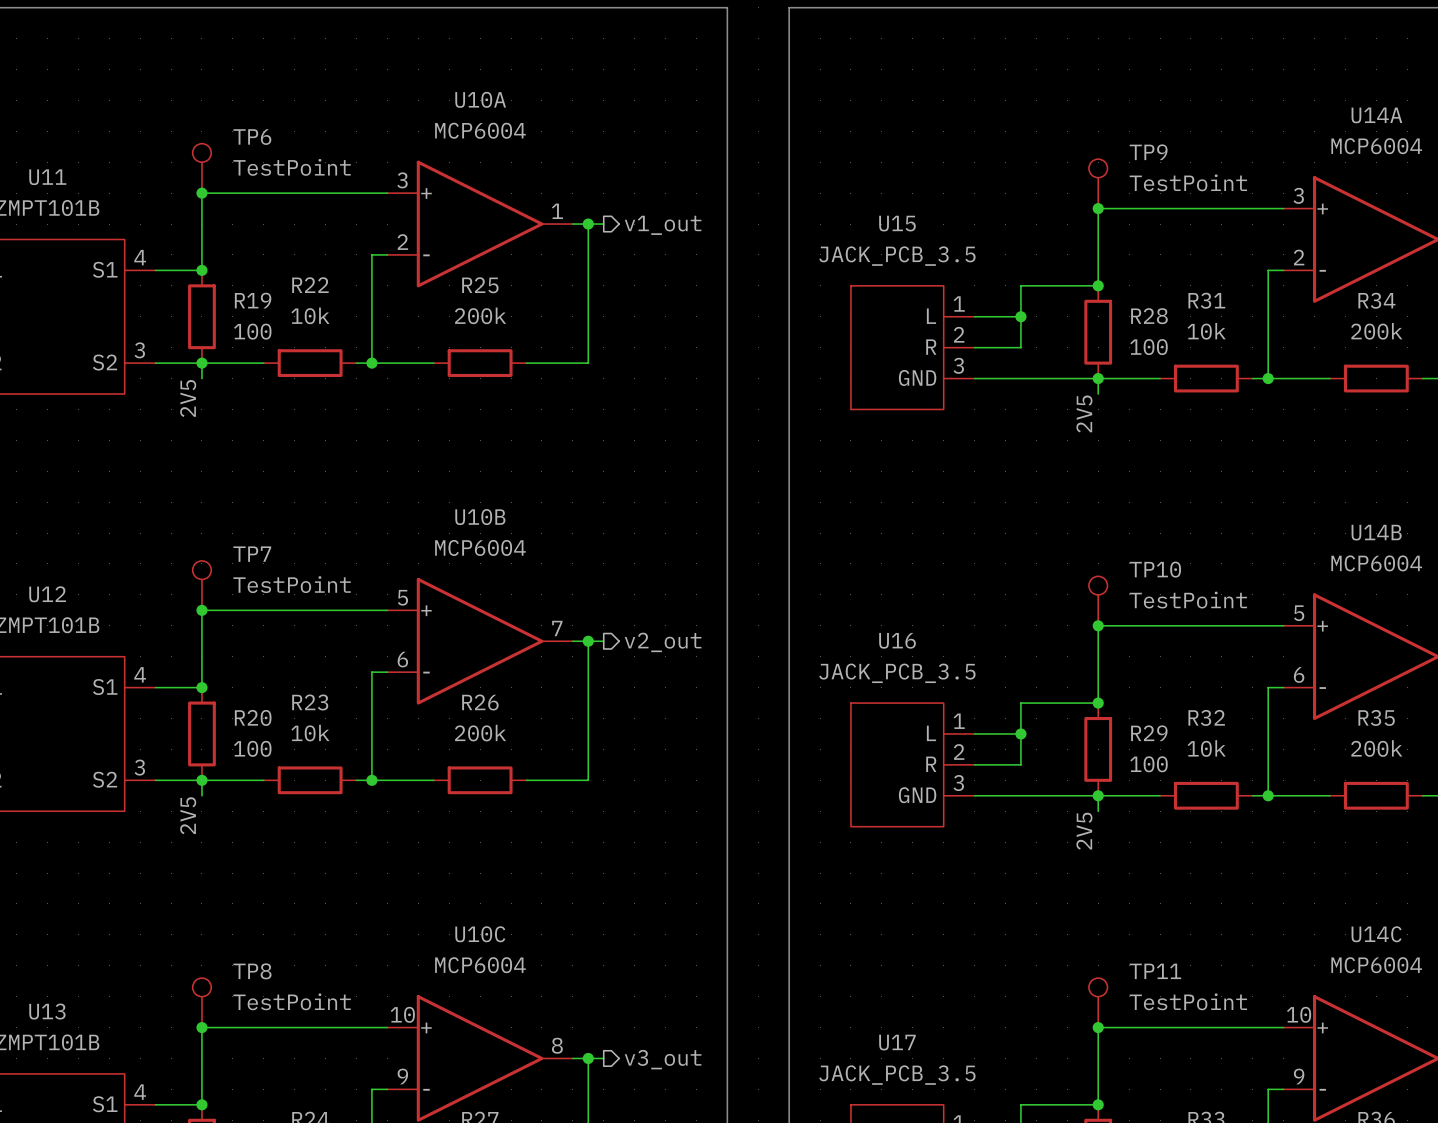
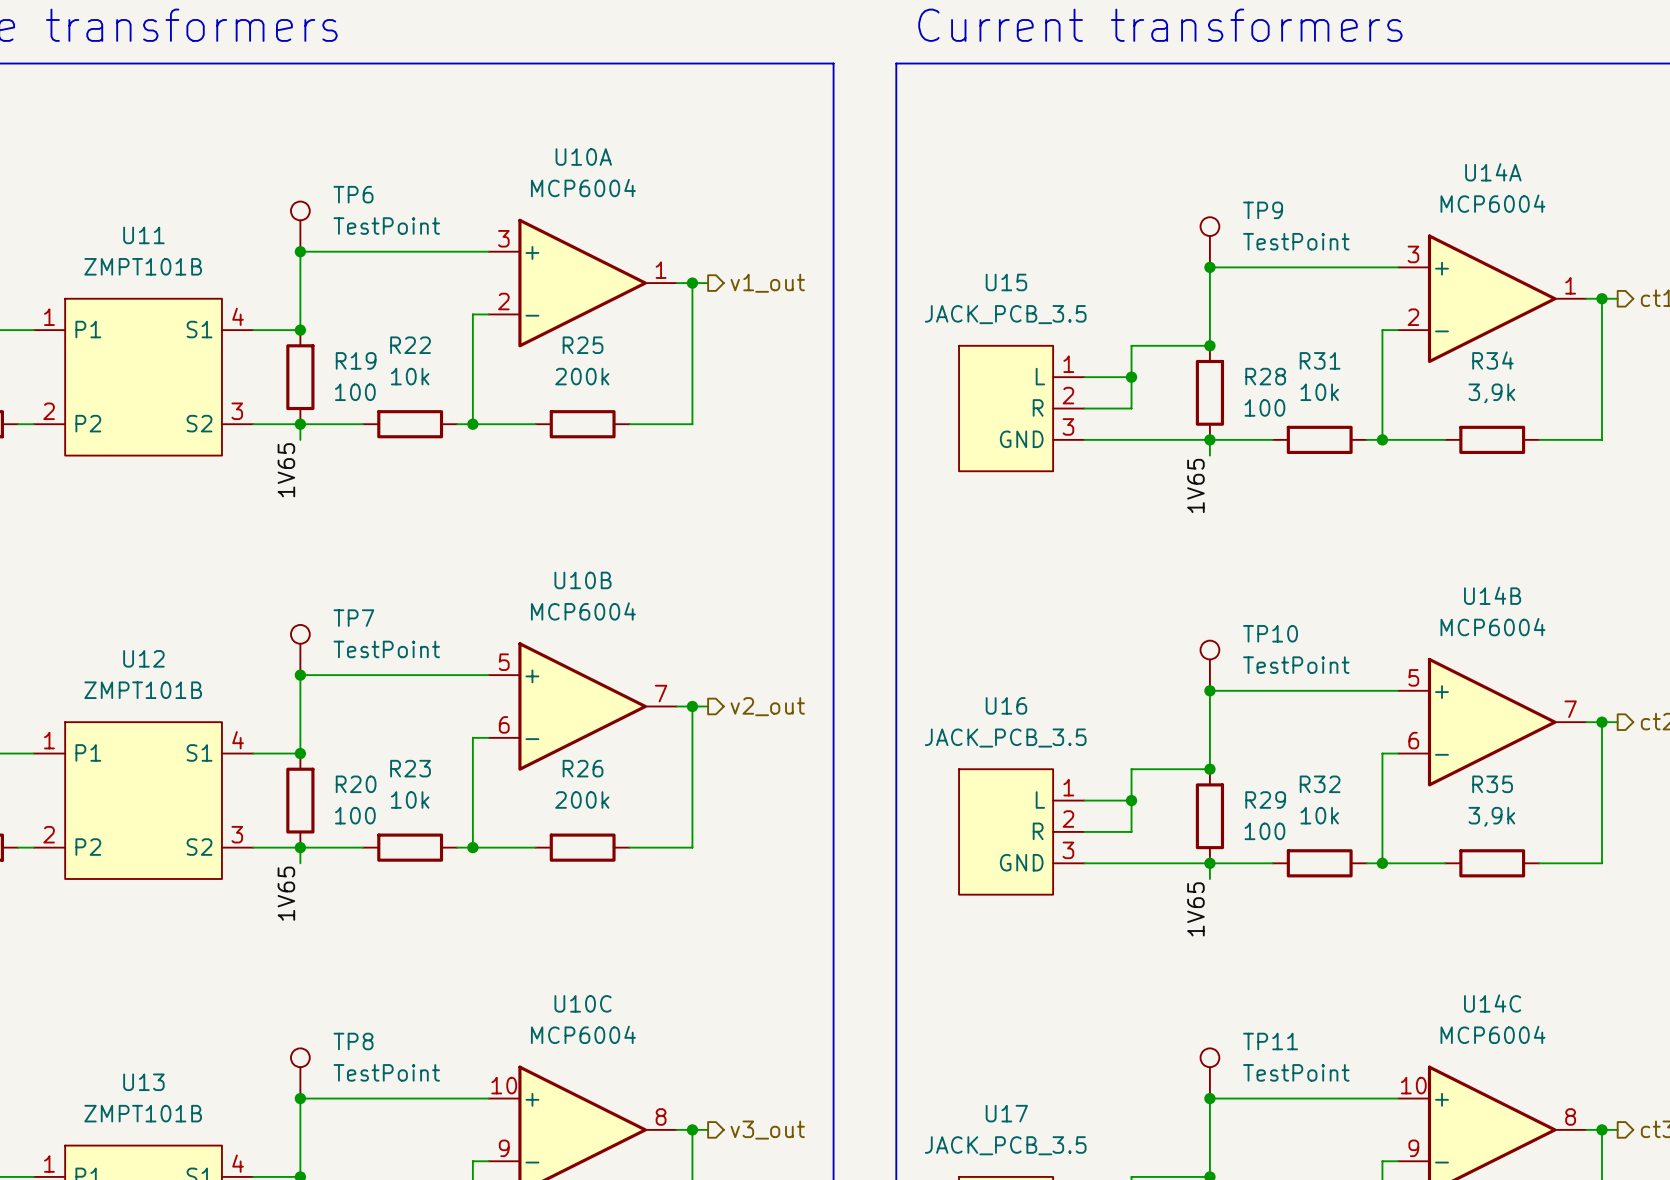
R34 value: 200k (1376, 331) -> 3,9k (1491, 393)
label: 2V5 (188, 398) -> 1V65 (286, 470)
label: 2V5 (1084, 413) -> 1V65 (1195, 485)
R35 value: 200k (1376, 748) -> 3,9k (1491, 816)
label: 2V5 (188, 815) -> 1V65 (286, 893)
label: 2V5 (1084, 831) -> 1V65 (1195, 909)

